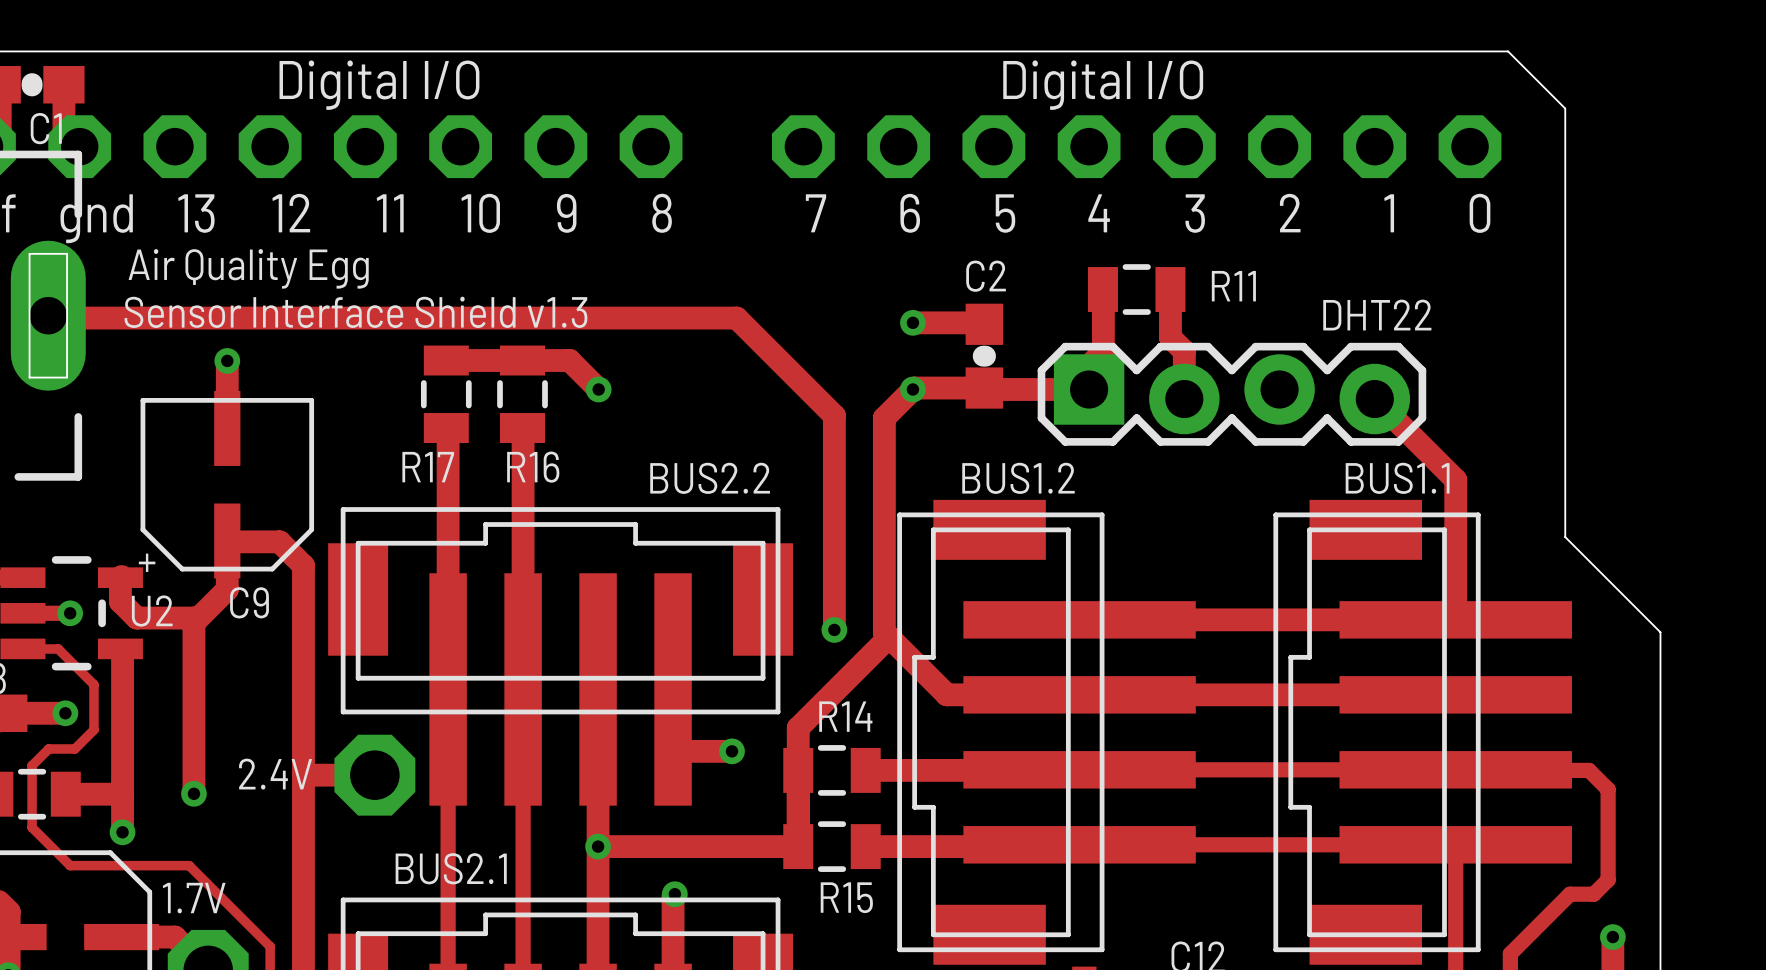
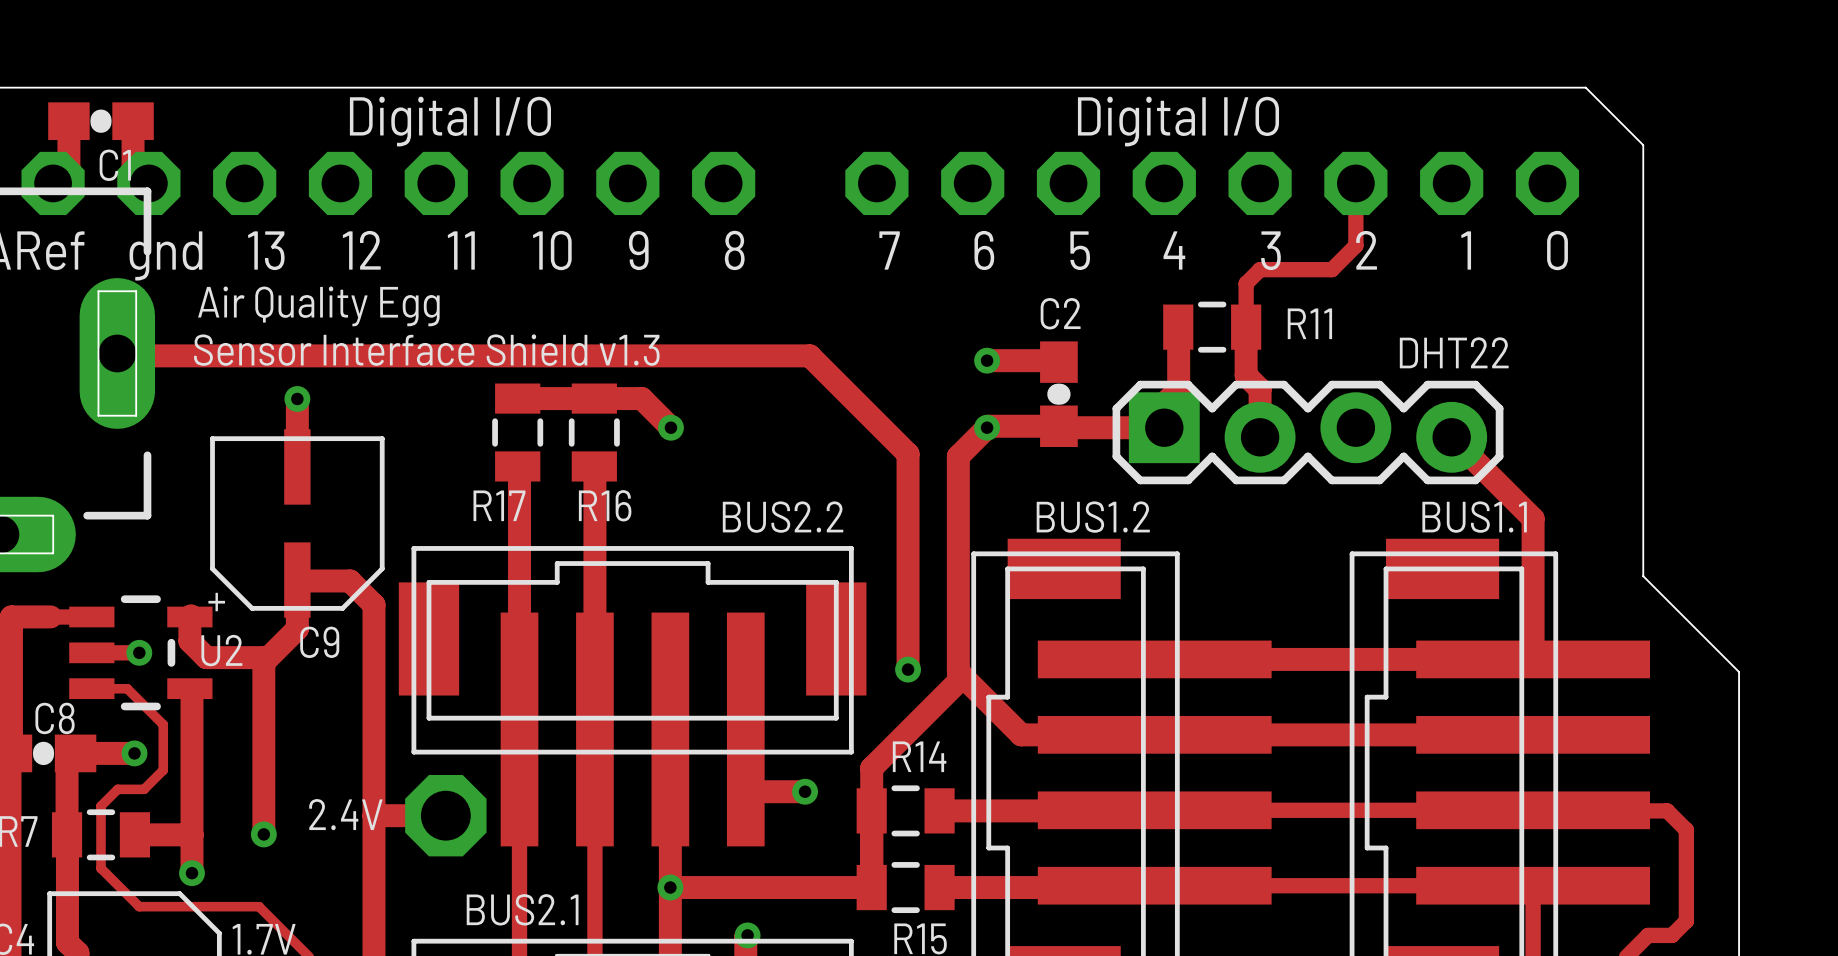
track: none -> (1355, 183) (1355, 245) (1331, 269) (1260, 269) (1246, 283) (1246, 327)

